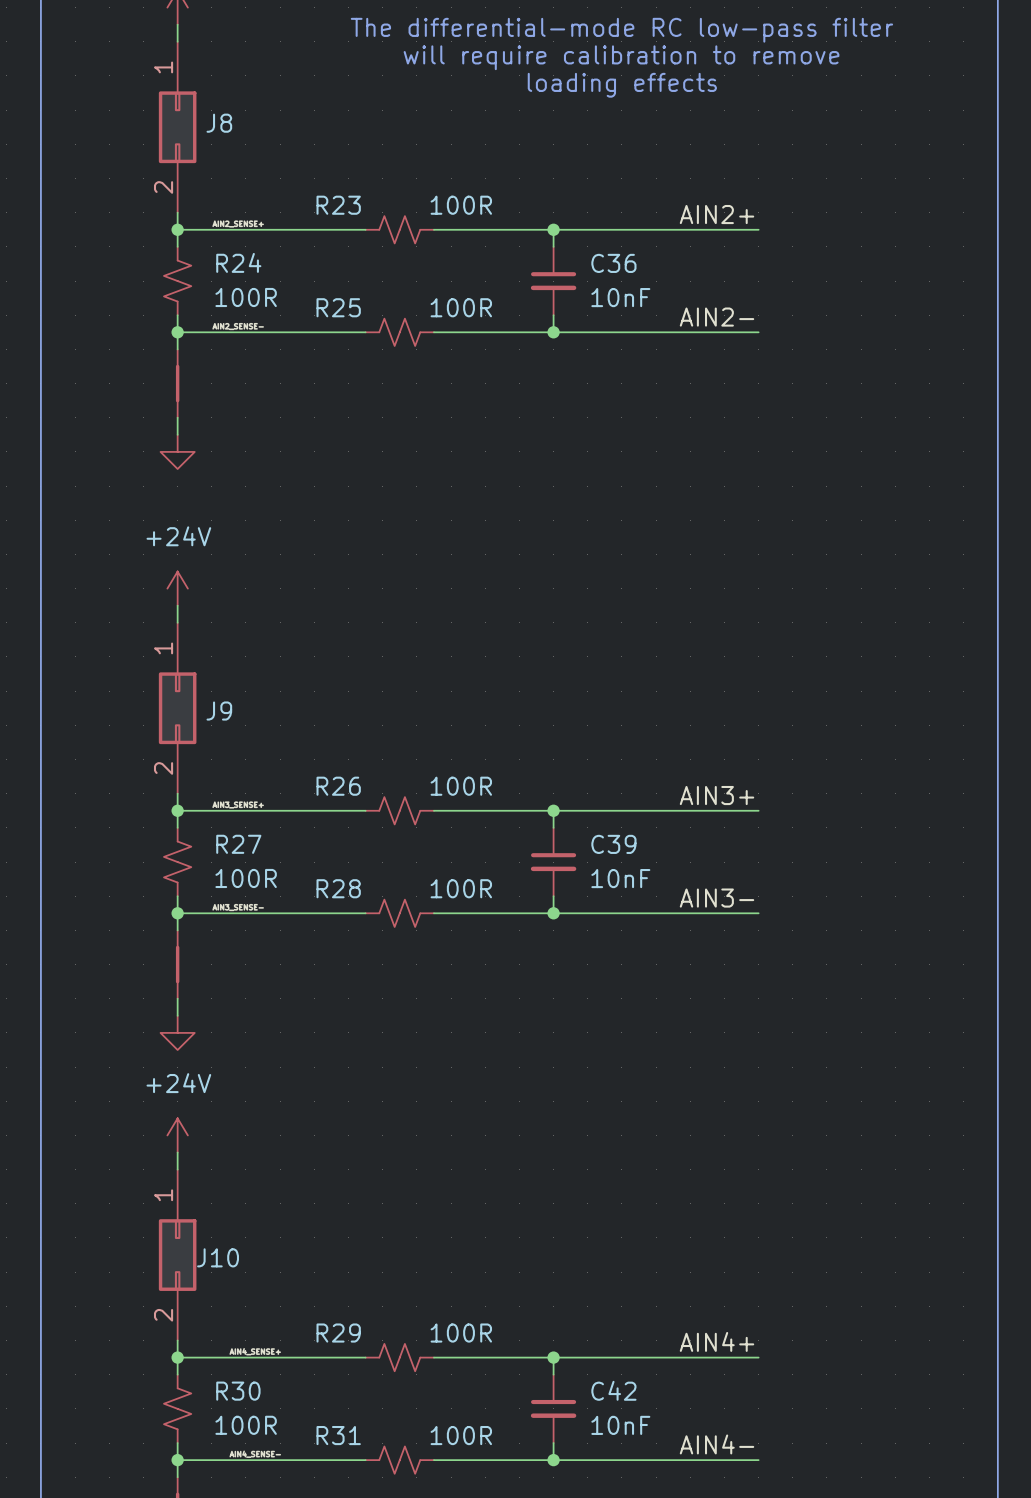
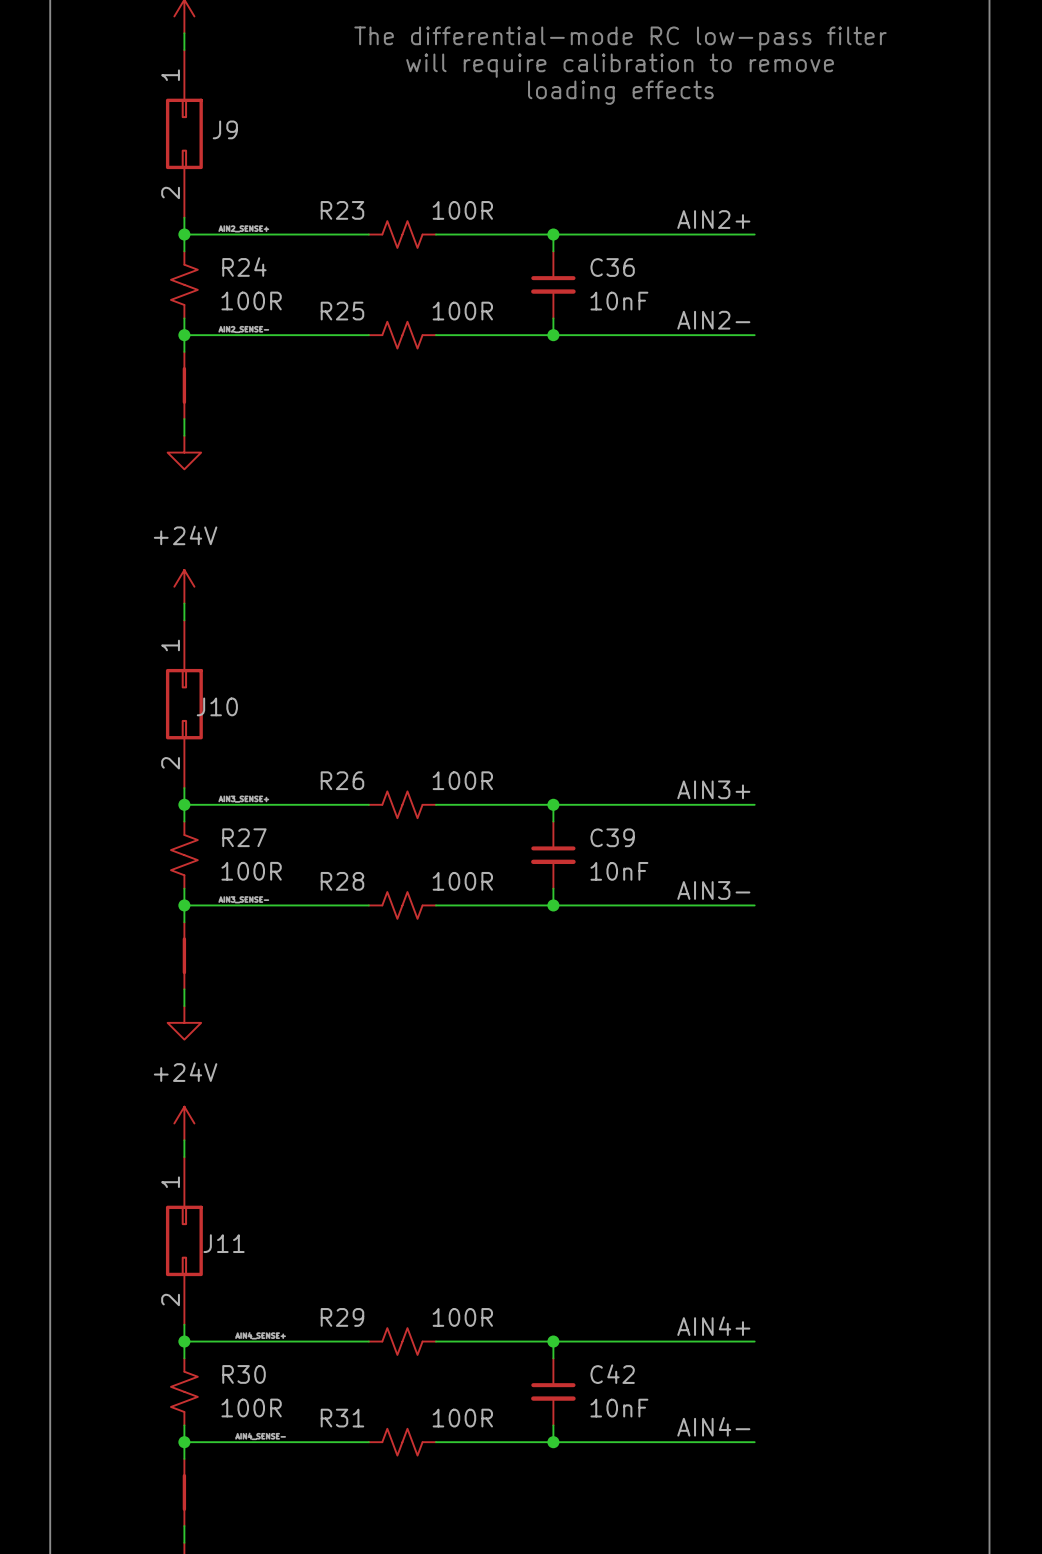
J8 name: J8 (219, 123) -> J9 (225, 129)
J9 name: J9 (219, 711) -> J10 (217, 706)
J10 name: J10 (218, 1257) -> J11 (224, 1243)

